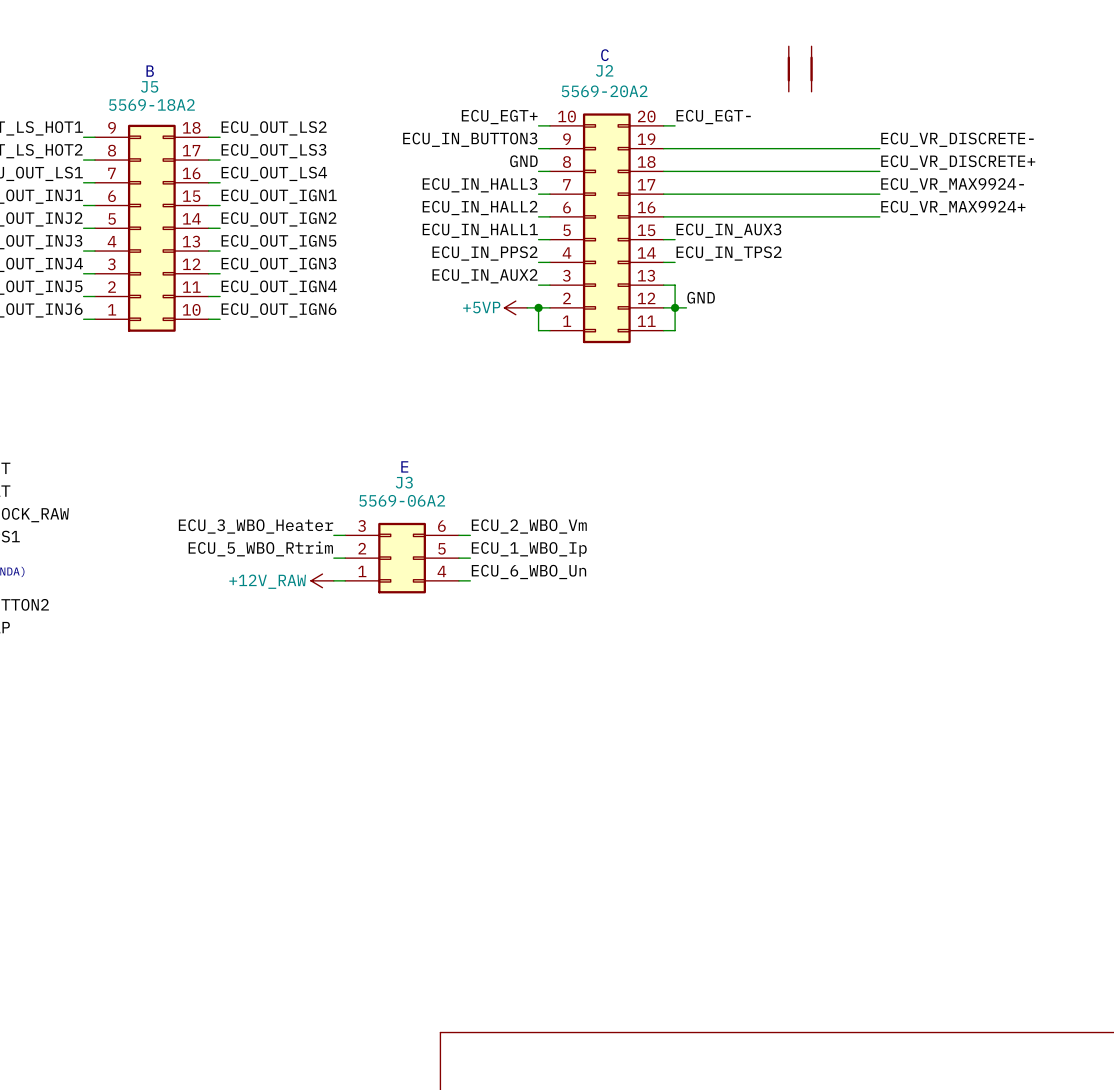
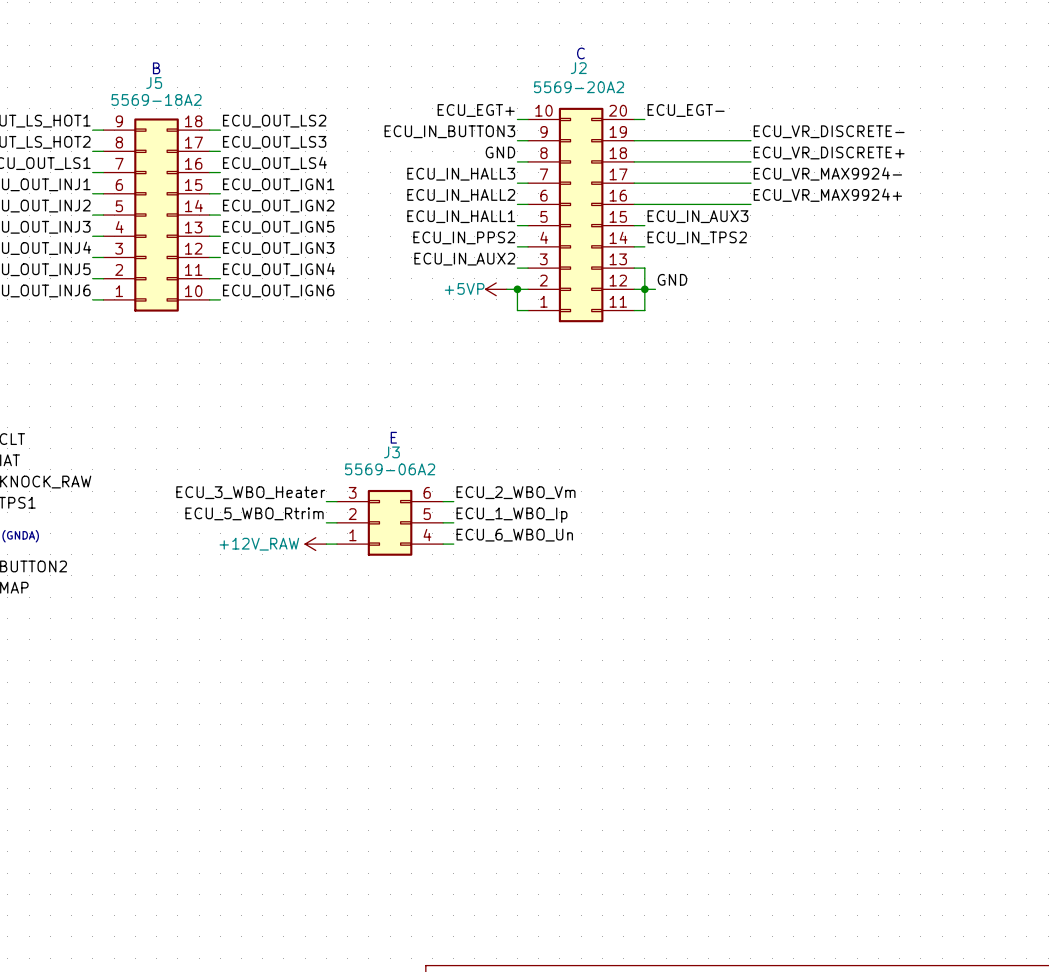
part: (788, 69) -> none
part: (811, 69) -> none
label position: ECU_VR_DISCRETE- (957, 139) -> ECU_VR_DISCRETE- (829, 131)
wire: (788, 148) (879, 148) -> none
label position: ECU_VR_DISCRETE+ (958, 162) -> ECU_VR_DISCRETE+ (829, 152)
wire: (788, 171) (879, 171) -> none
label position: ECU_VR_MAX9924- (952, 185) -> ECU_VR_MAX9924- (827, 173)
wire: (788, 194) (879, 194) -> none
label position: ECU_VR_MAX9924+ (953, 208) -> ECU_VR_MAX9924+ (827, 195)
wire: (788, 216) (879, 216) -> none

